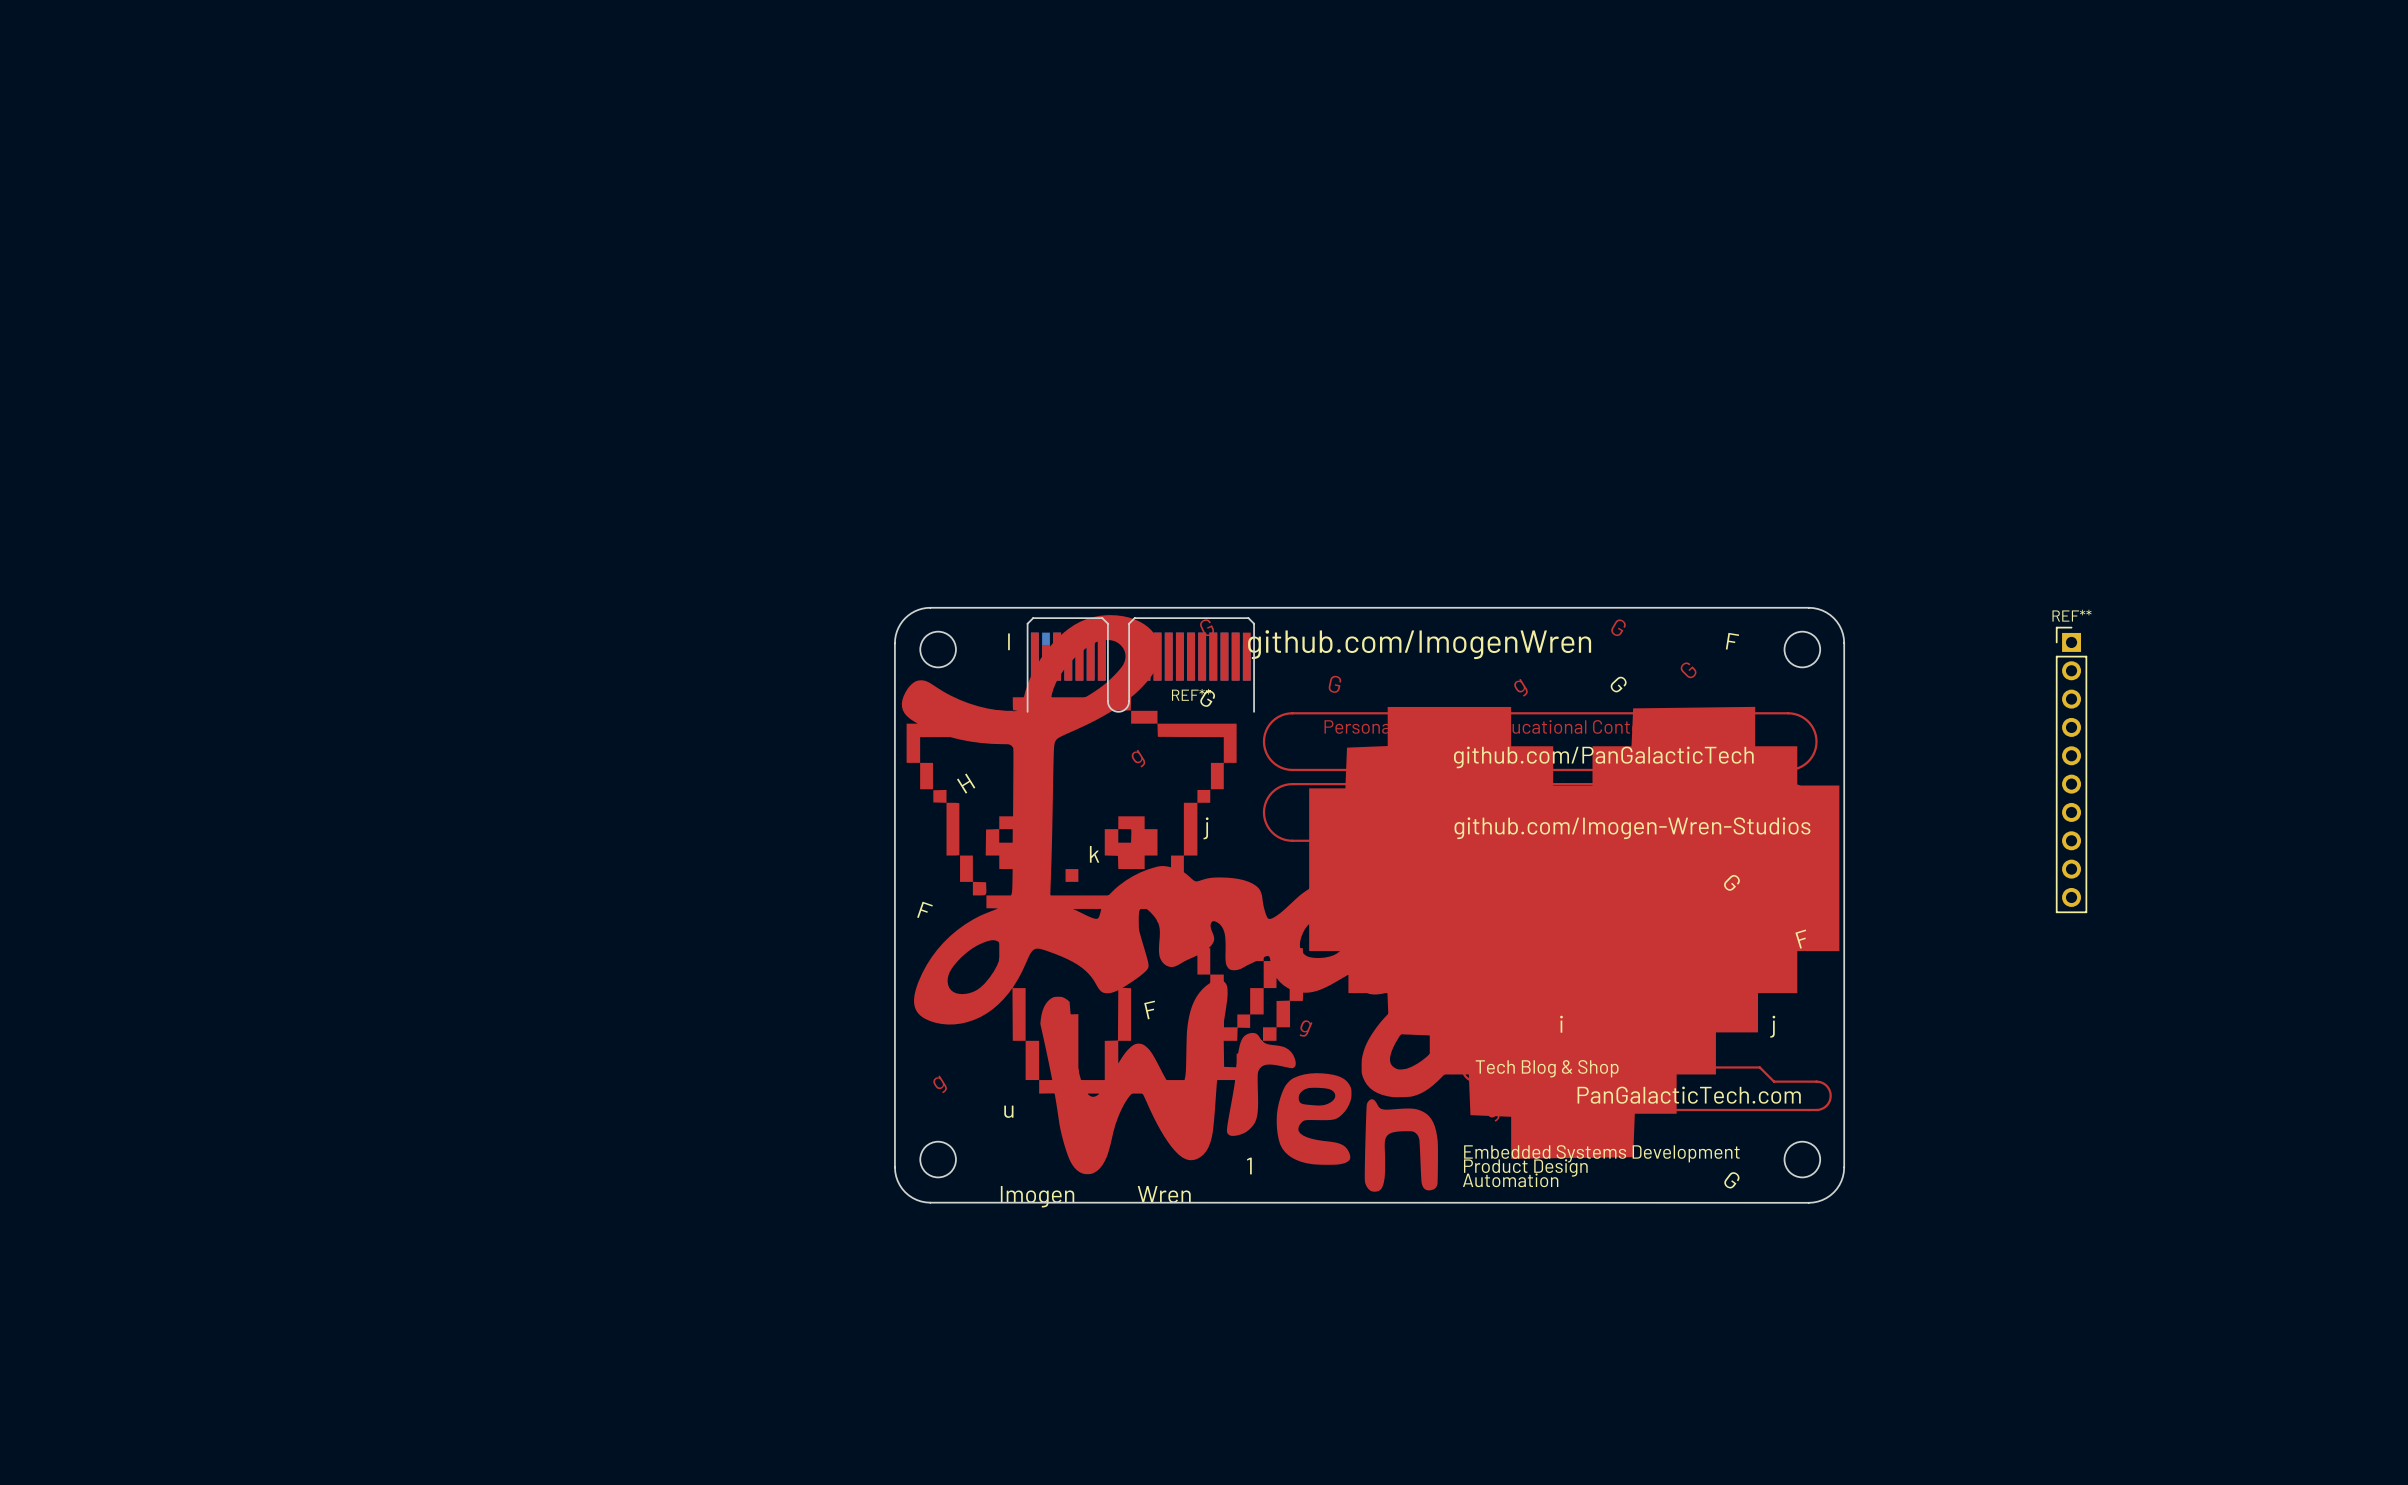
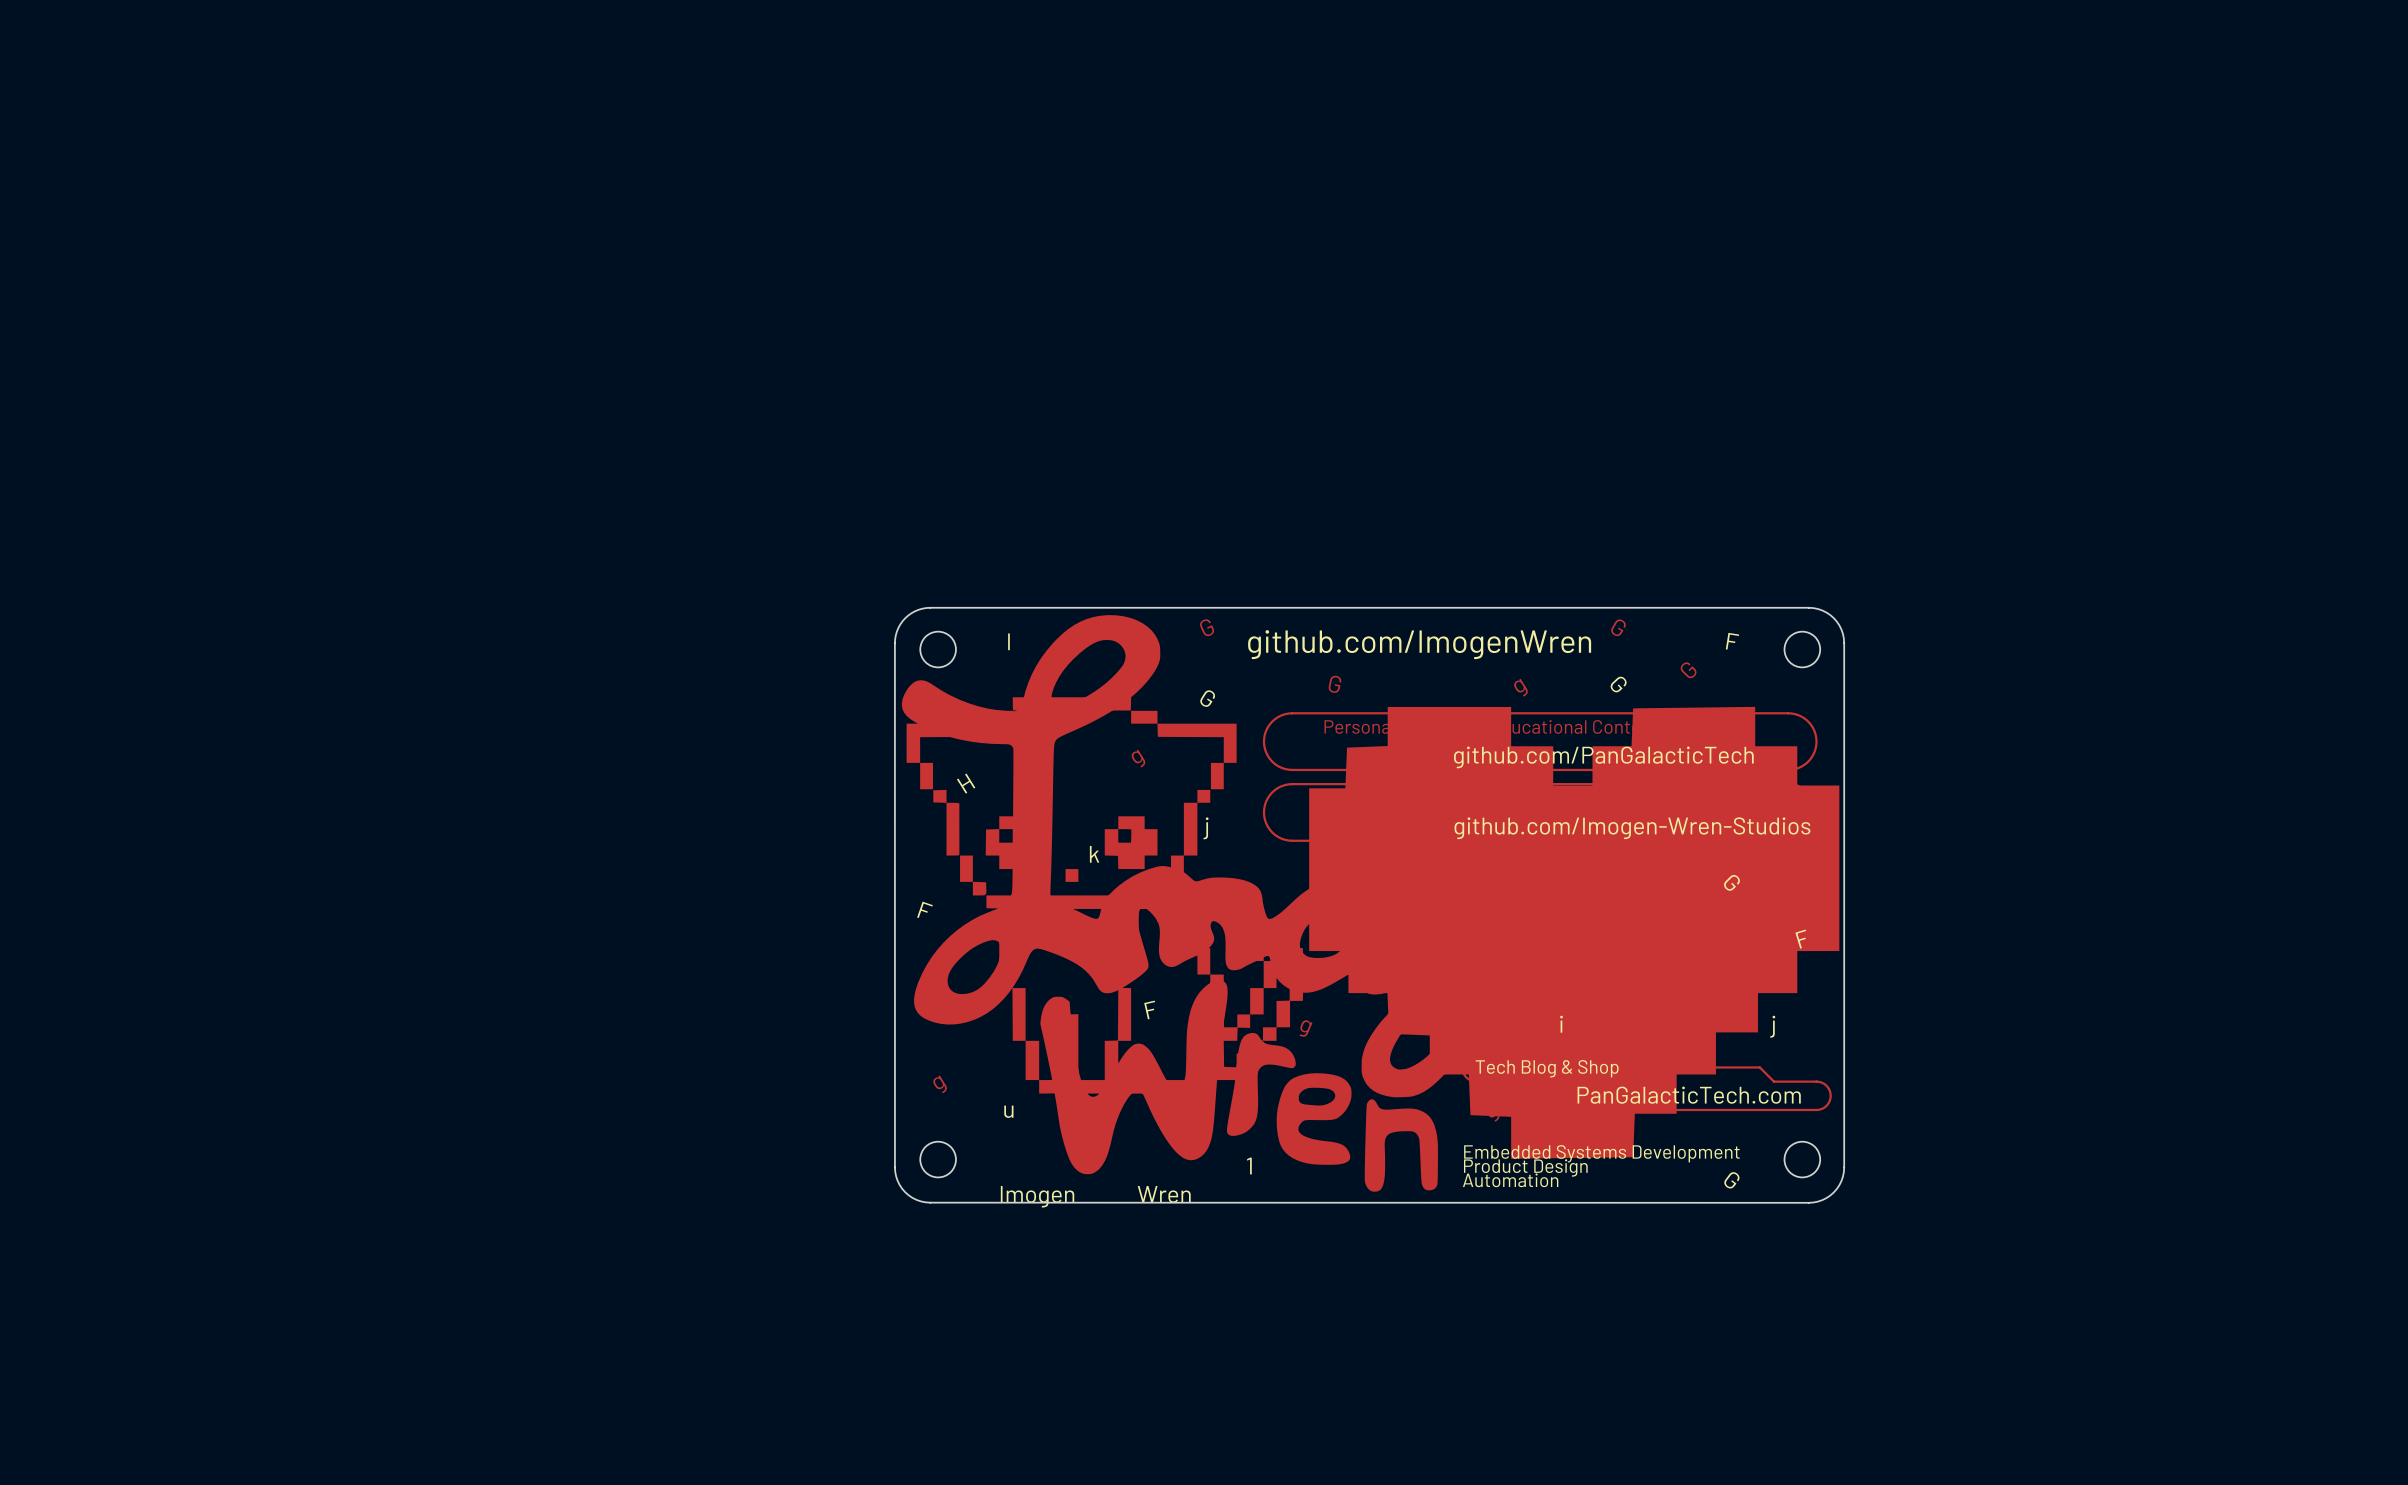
REF**: (1140, 664) -> none
REF**: (2071, 769) -> none

